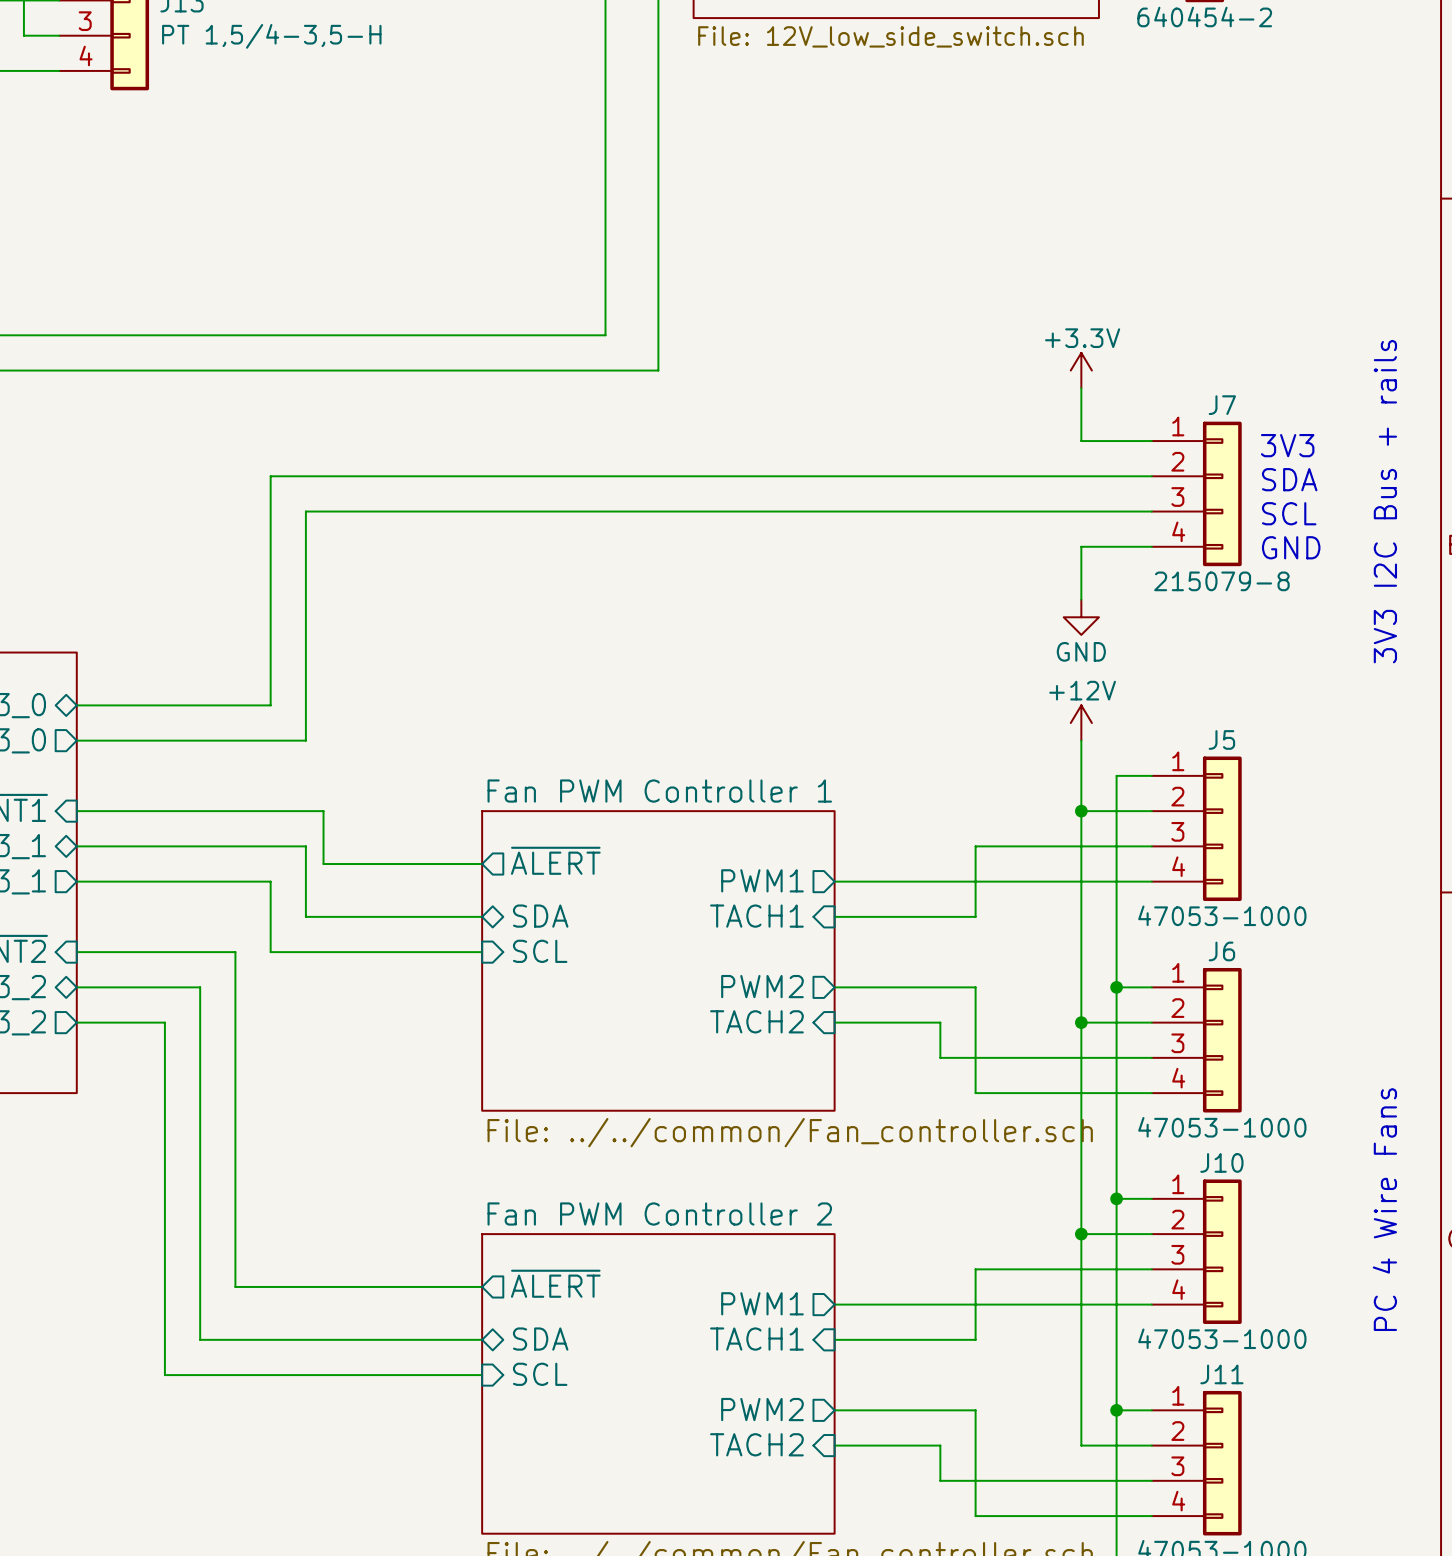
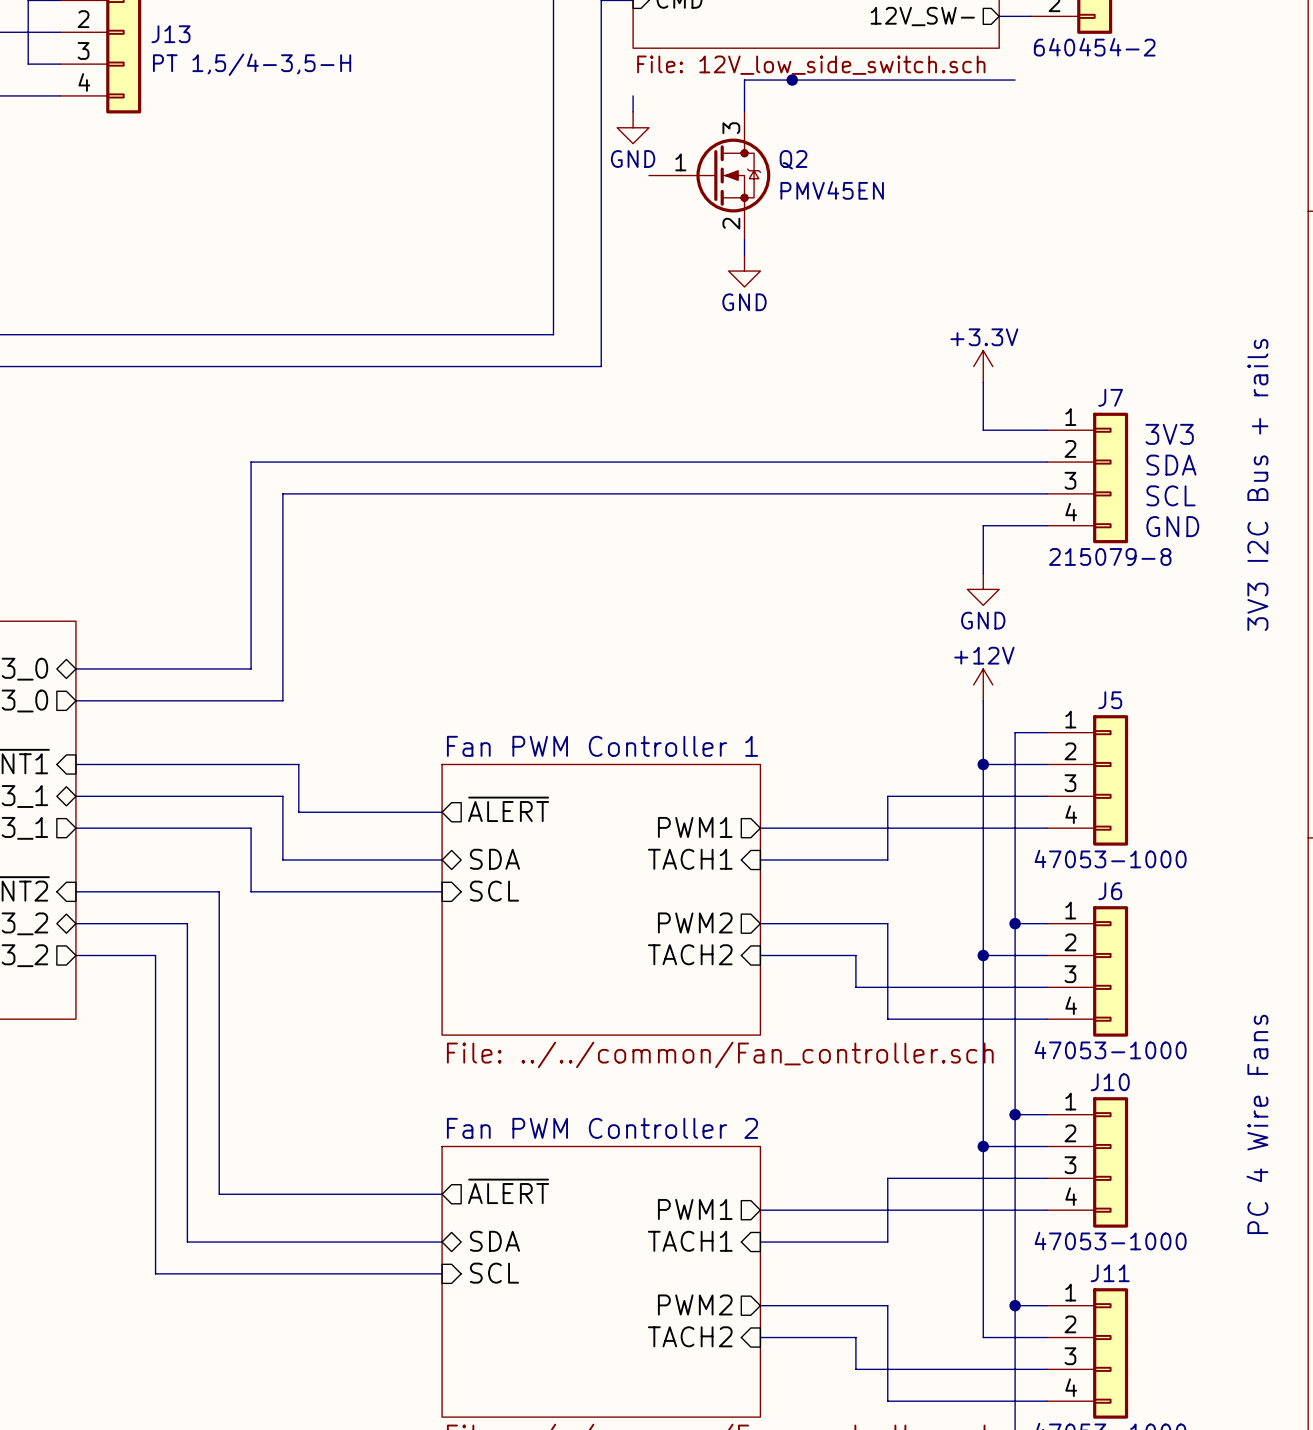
junction: none -> (792, 80)
wire: none -> (1015, 80) (744, 80) (744, 111)
wire: none -> (633, 95) (633, 111)
power symbol: none -> GND (633, 127)
Q2: none -> PMV45EN (709, 175)
wire: none -> (744, 239) (744, 255)
power symbol: none -> GND (744, 271)

